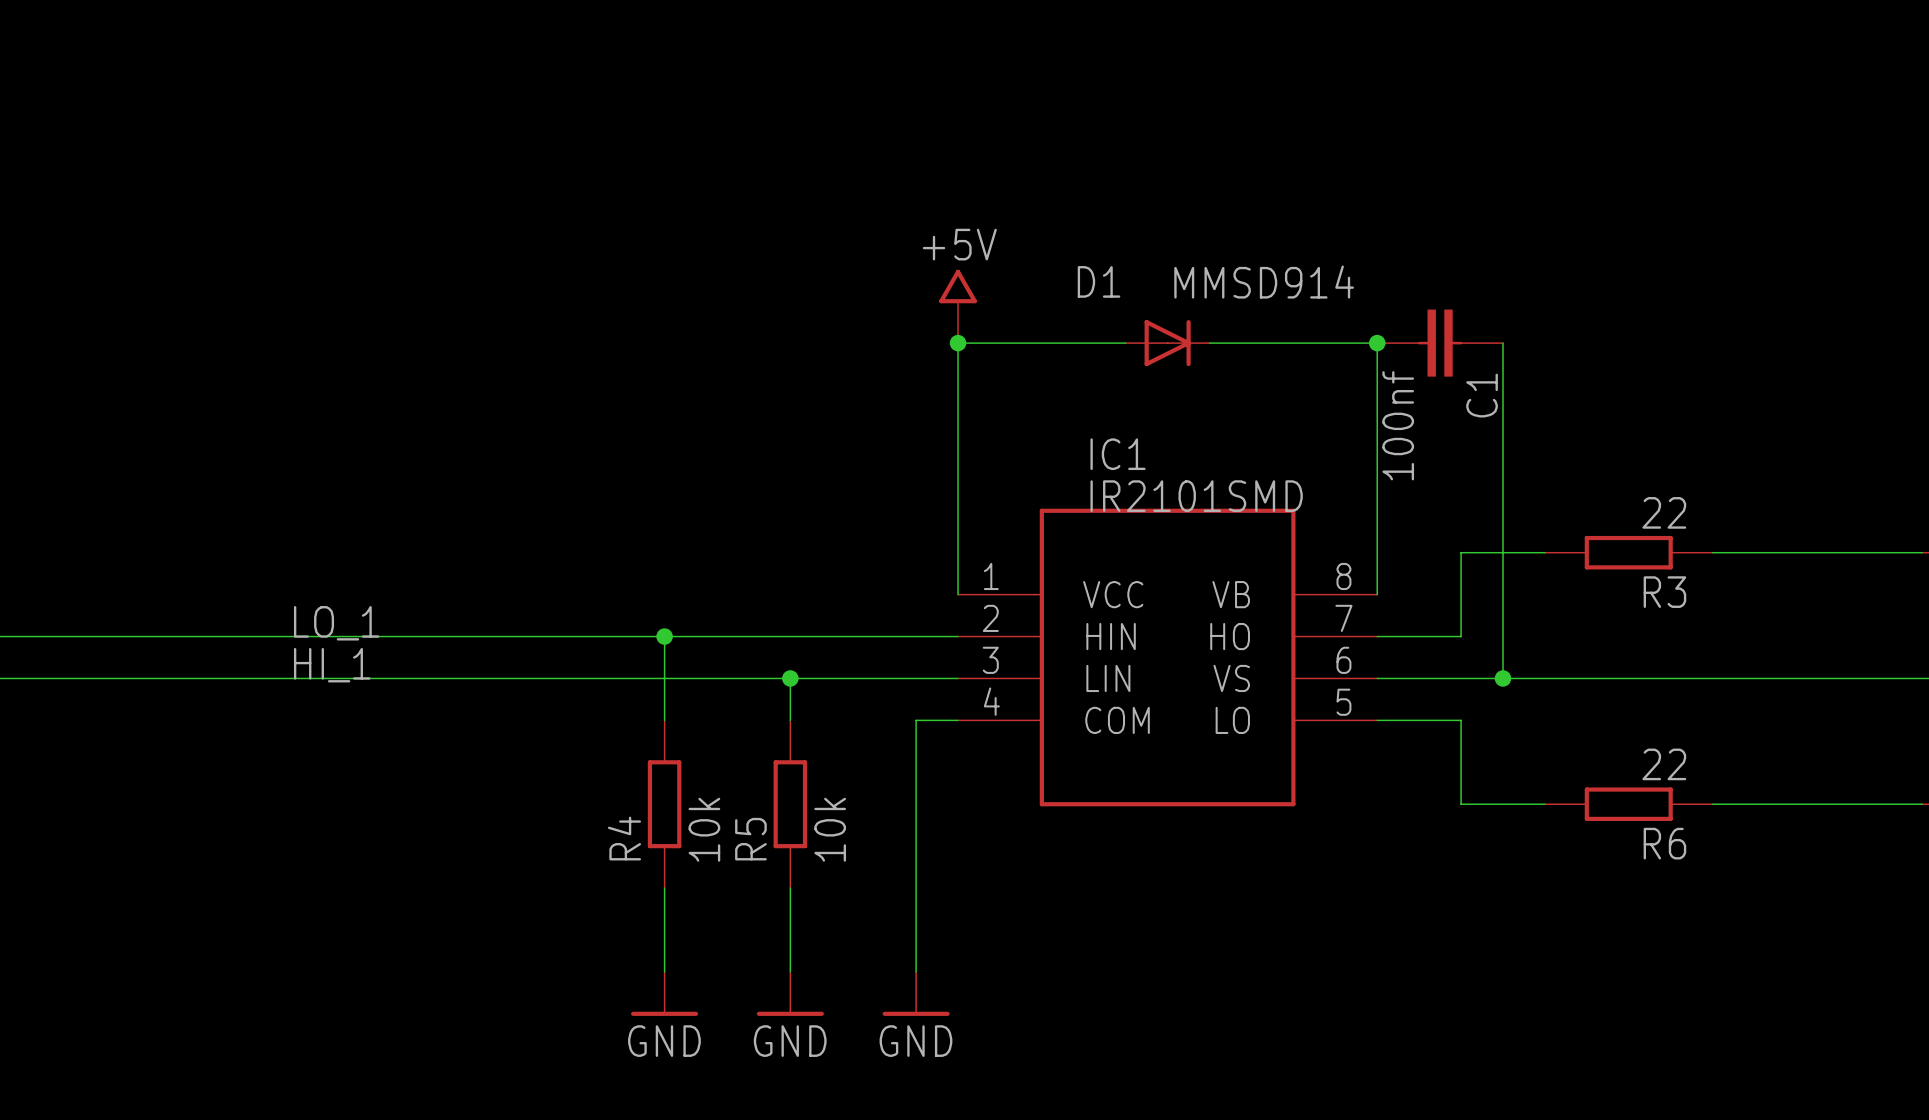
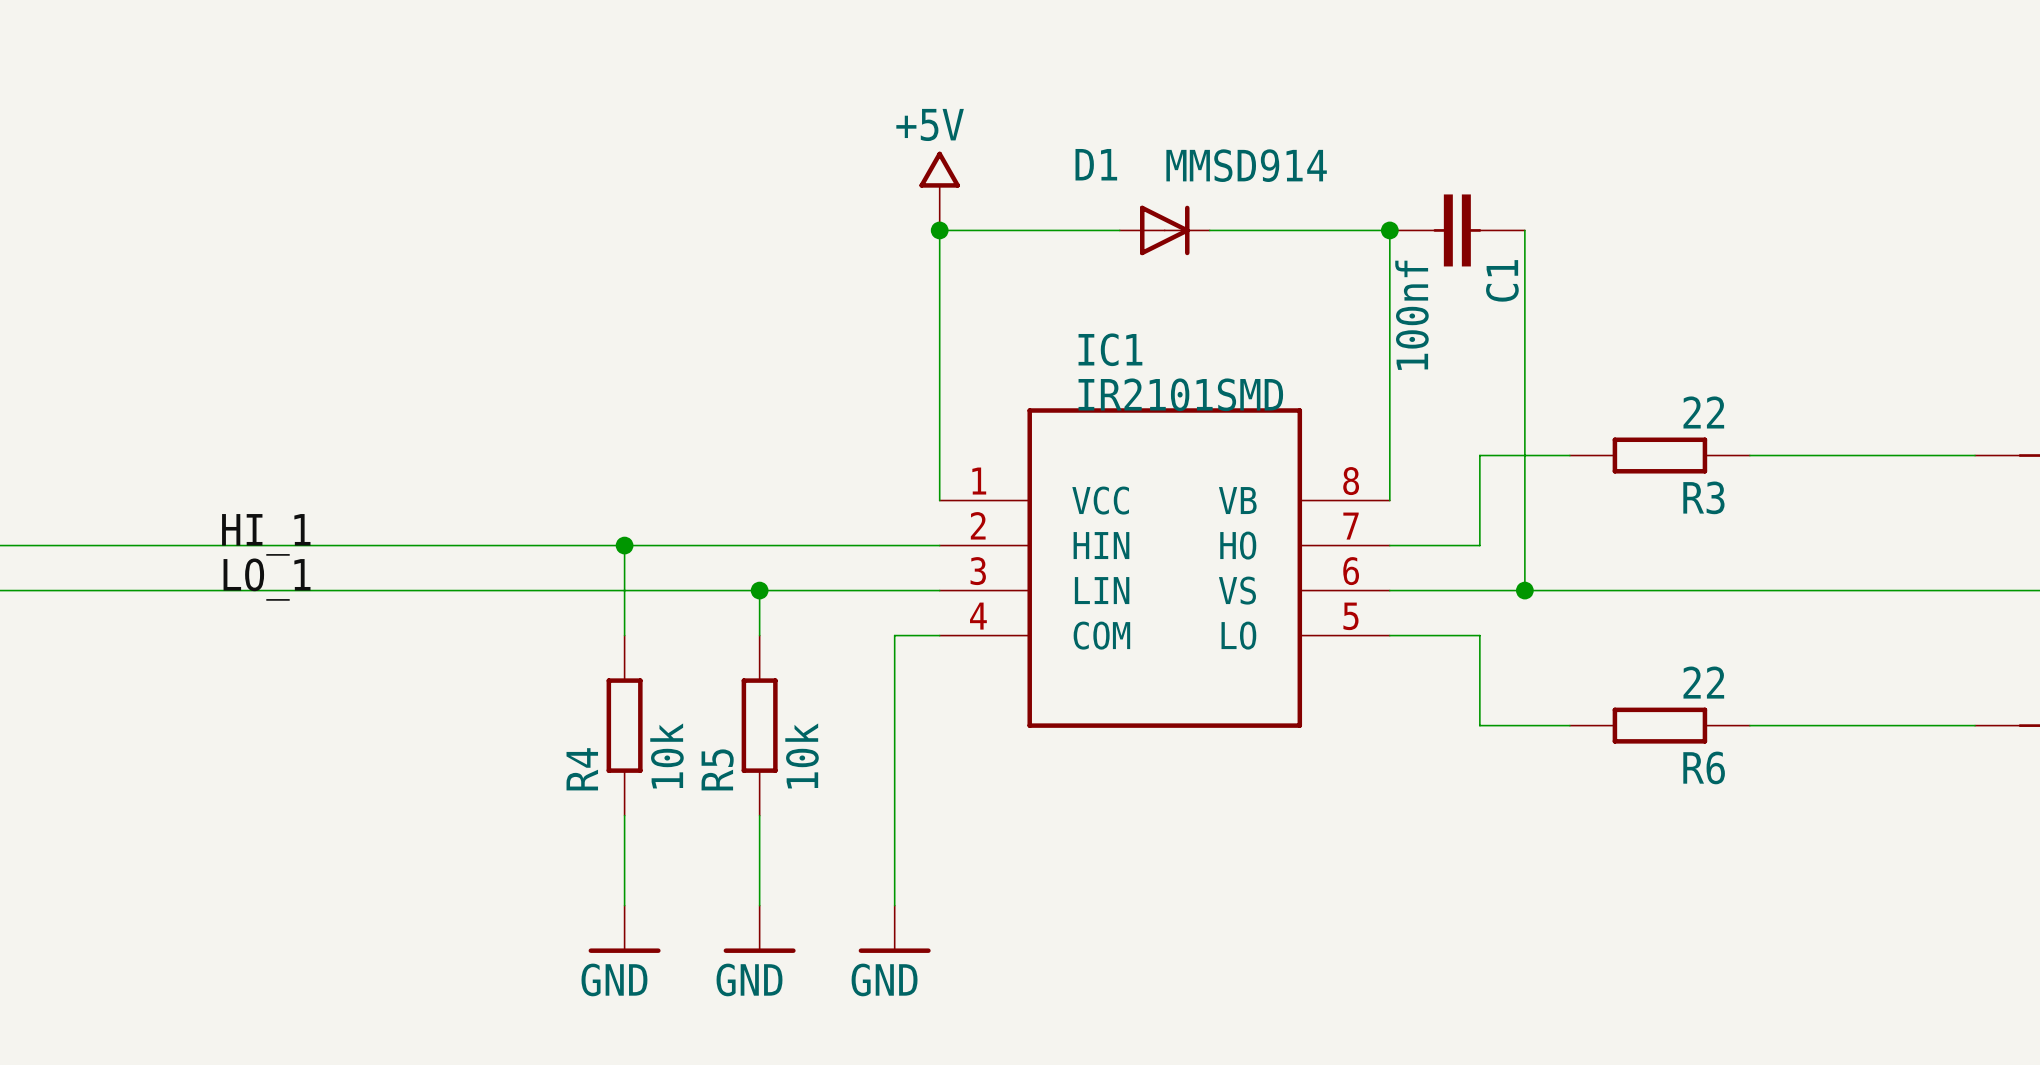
label: LO_1 (336, 623) -> HI_1 (266, 534)
label: HI_1 (332, 665) -> LO_1 (267, 579)

